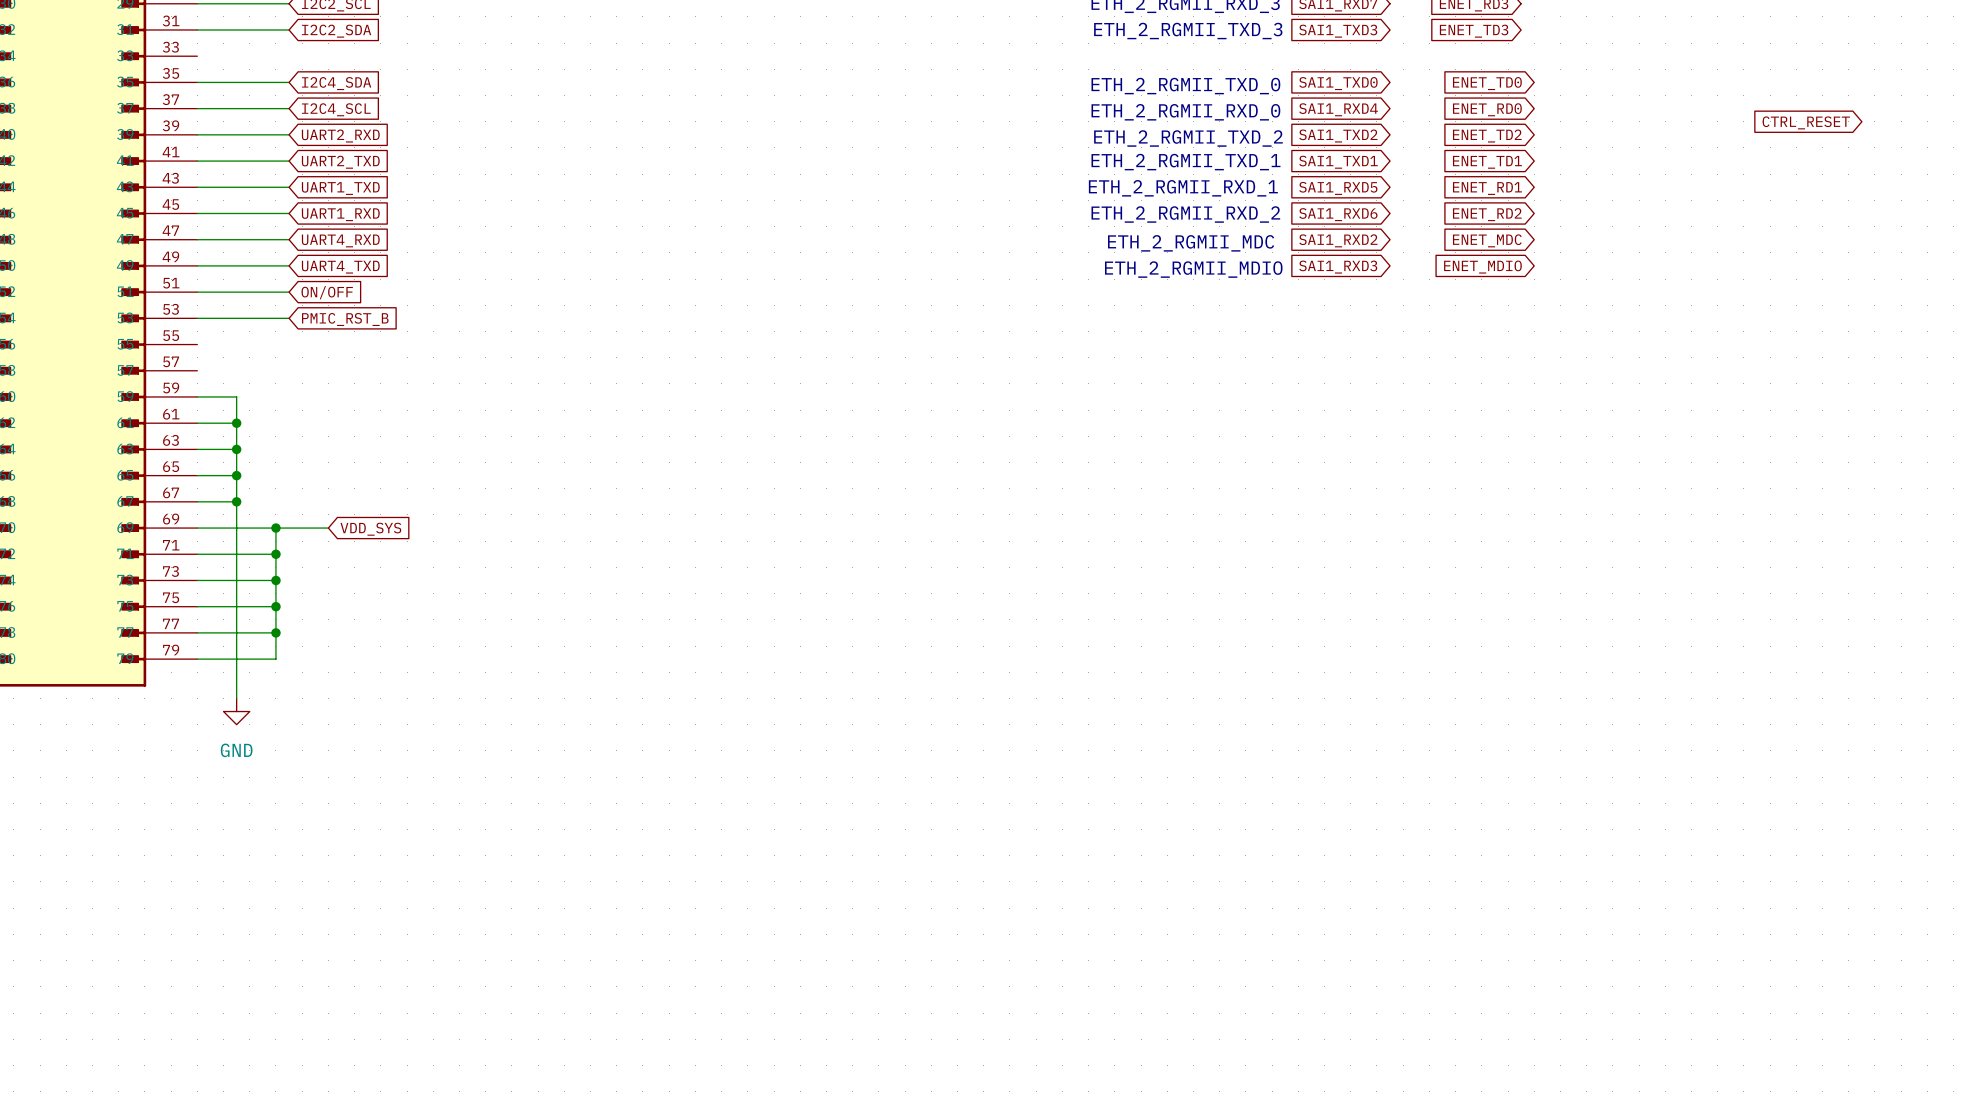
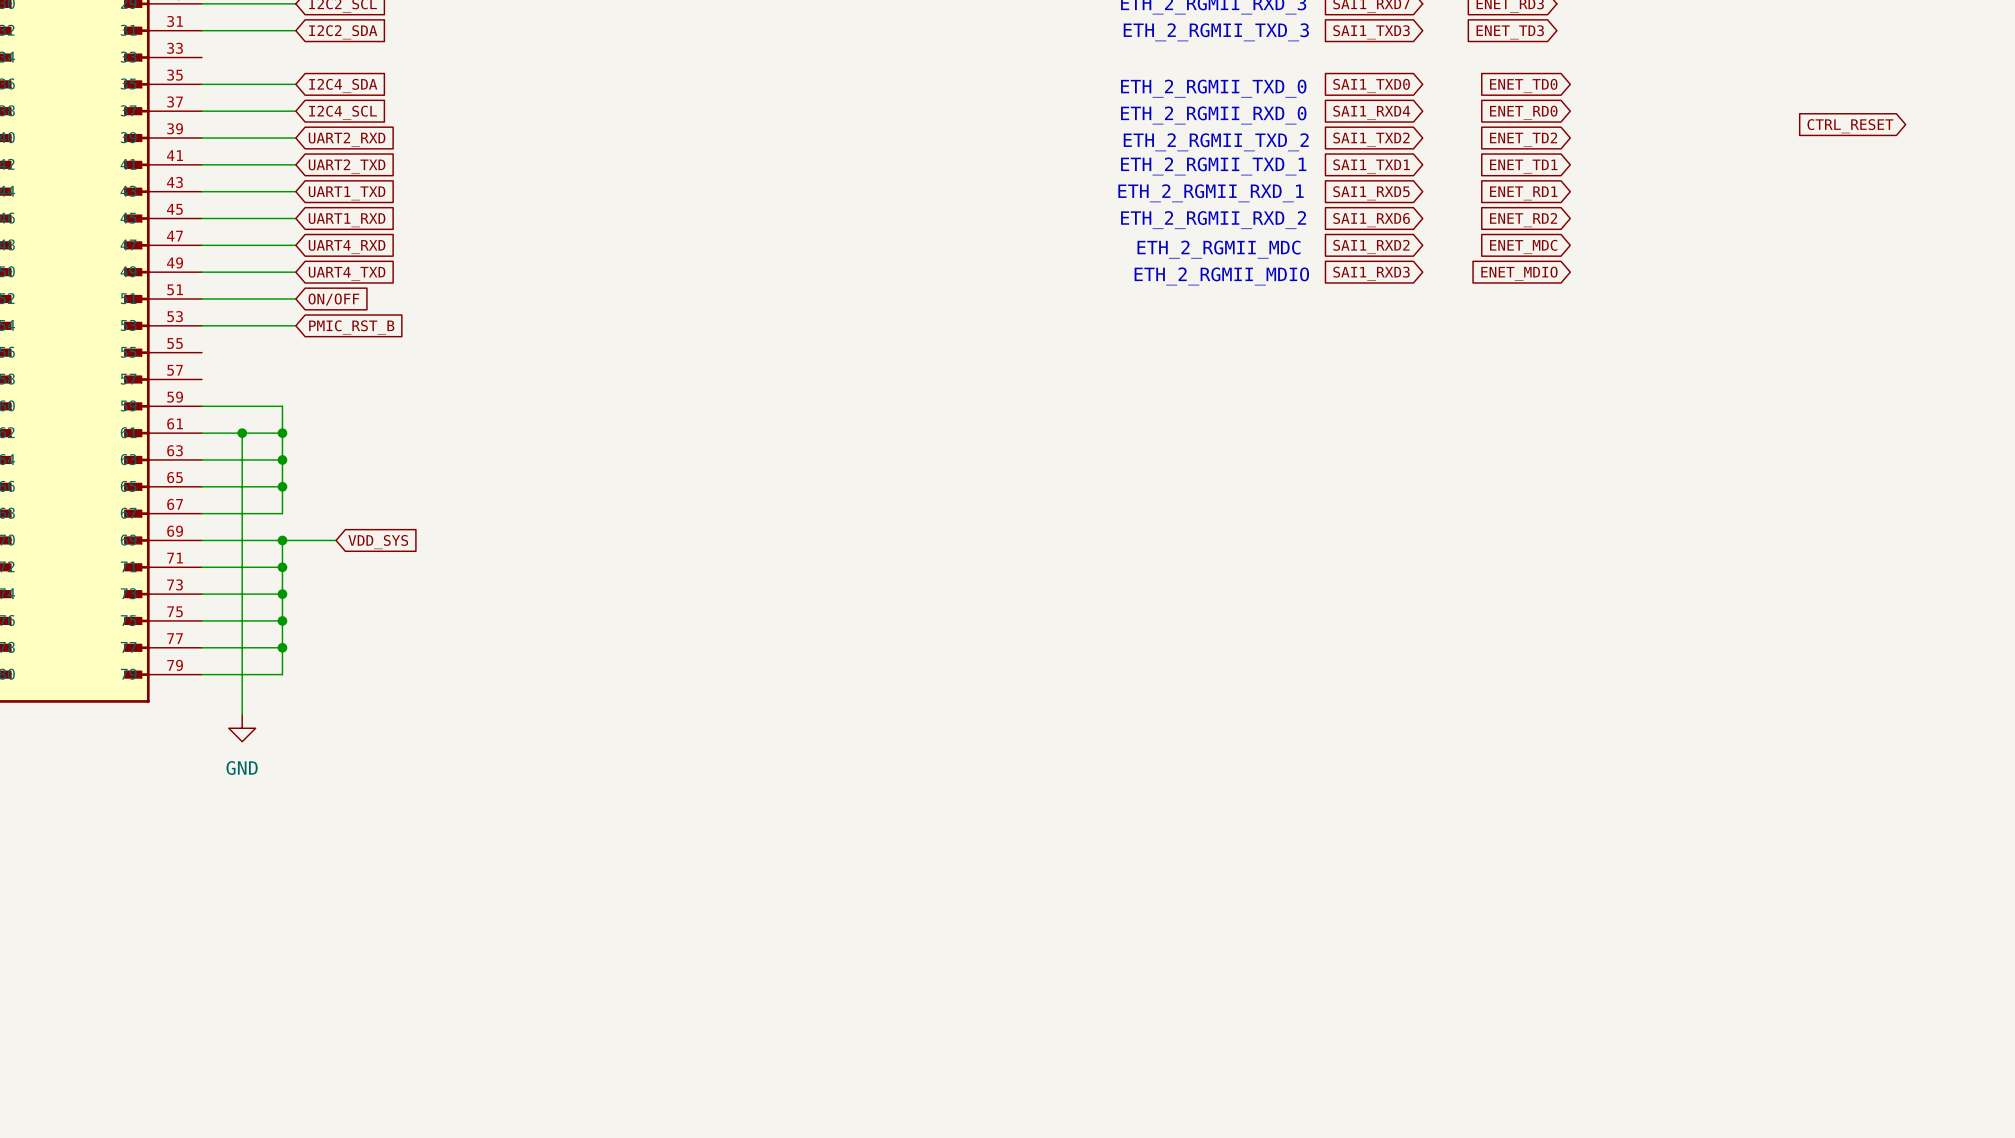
wire: (236, 396) (236, 423) -> (282, 433) (242, 433)
wire: none -> (242, 406) (282, 406) (282, 513) (242, 513)
junction: none -> (282, 433)
wire: none -> (242, 459) (282, 459)
junction: (236, 449) -> none
junction: none -> (282, 459)
wire: none -> (242, 486) (282, 486)
junction: (236, 475) -> none
junction: none -> (282, 486)
junction: (236, 501) -> none

